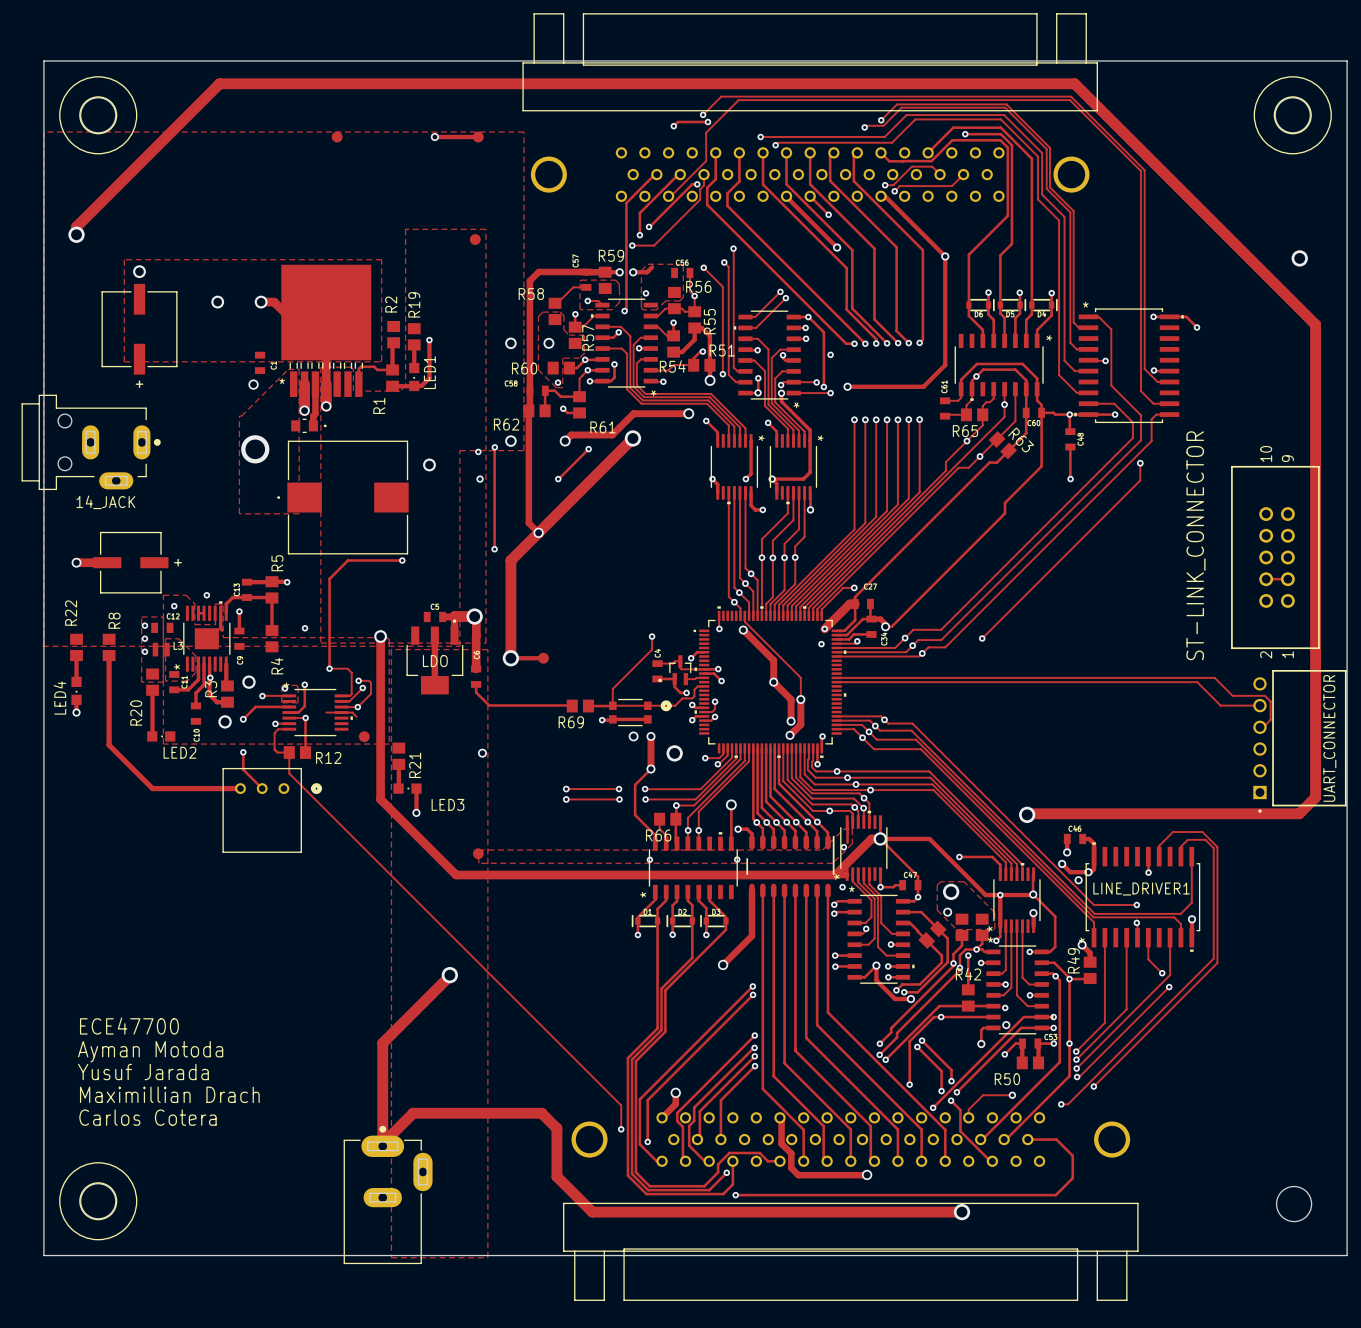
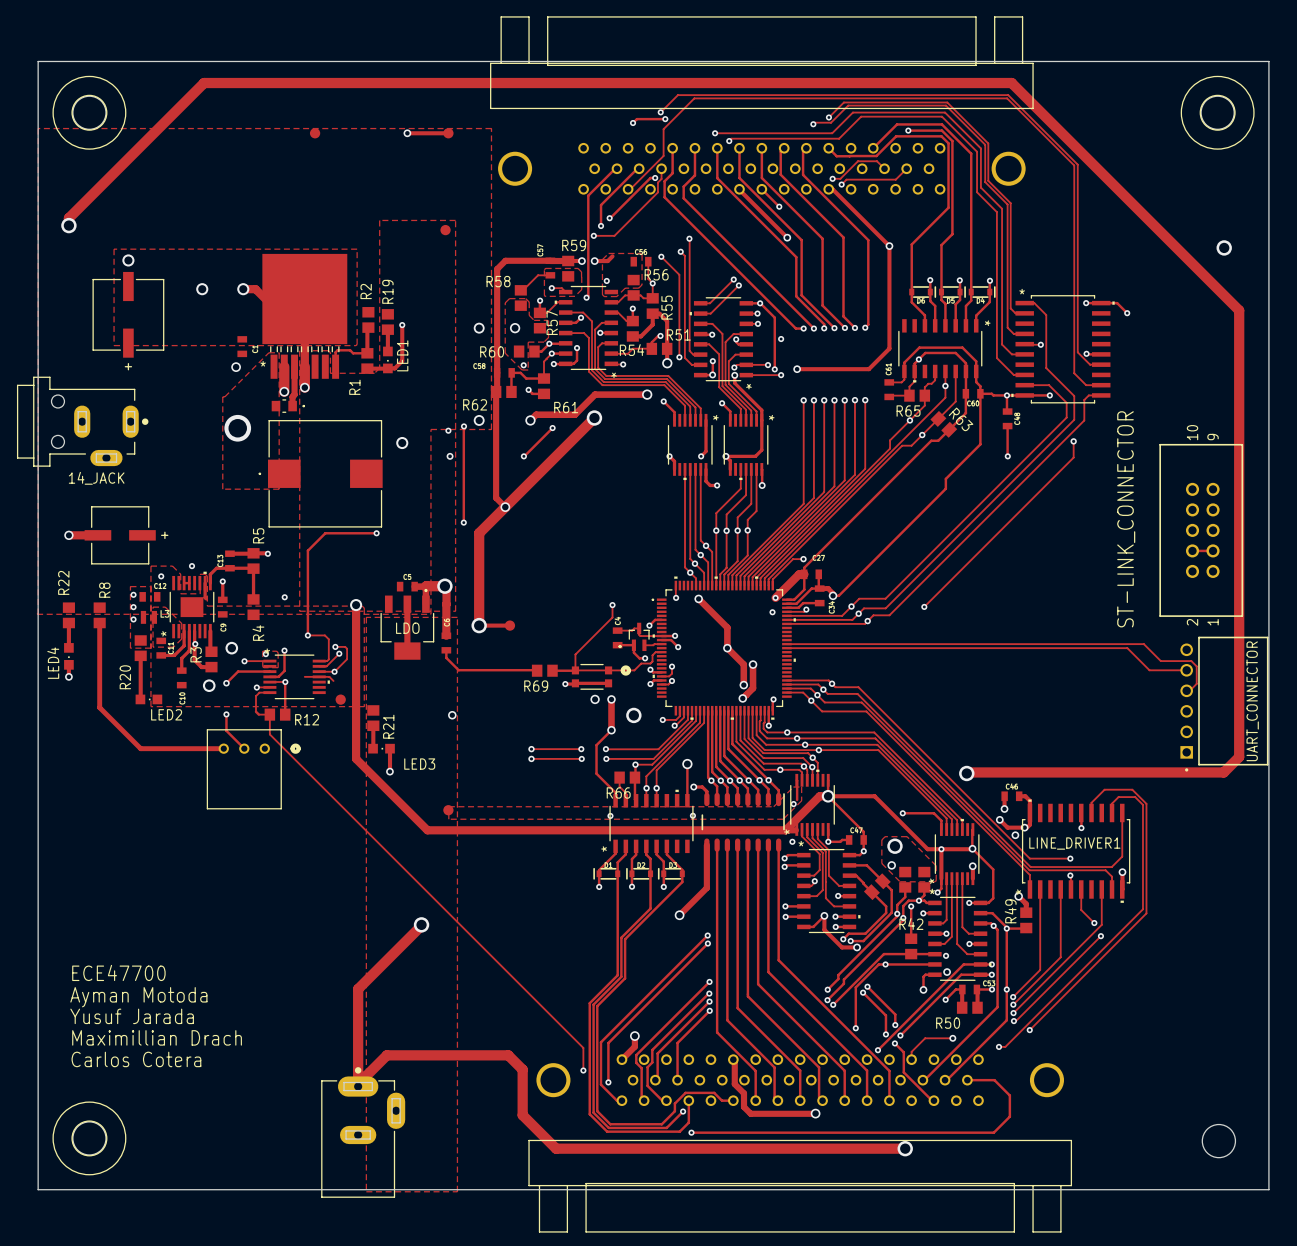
track: (744, 615) (744, 621) (800, 677) (800, 699) -> none

